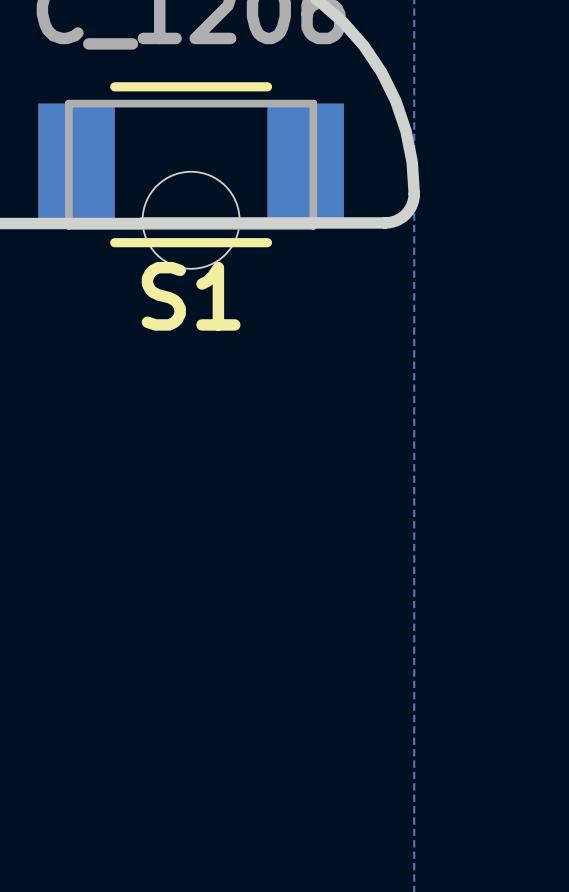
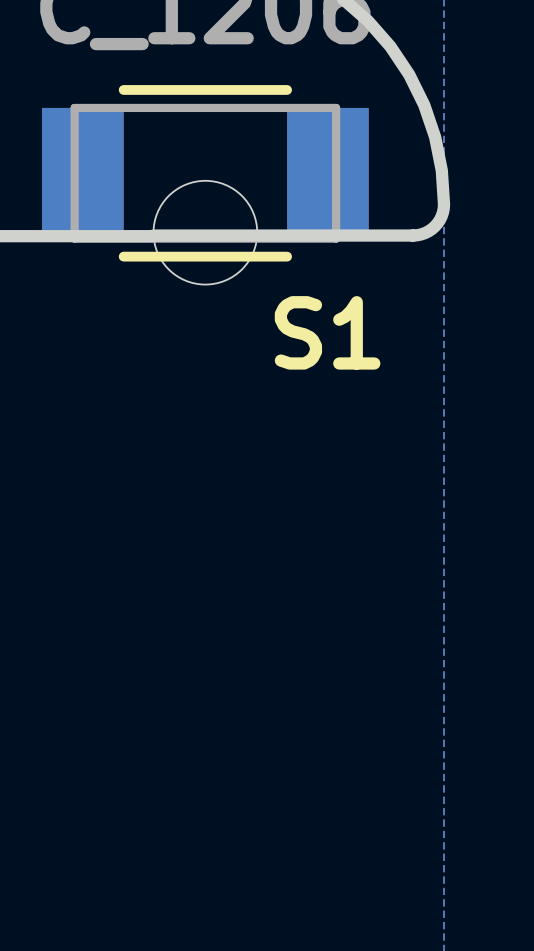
S1 name position: S1 (191, 296) -> S1 (327, 332)

